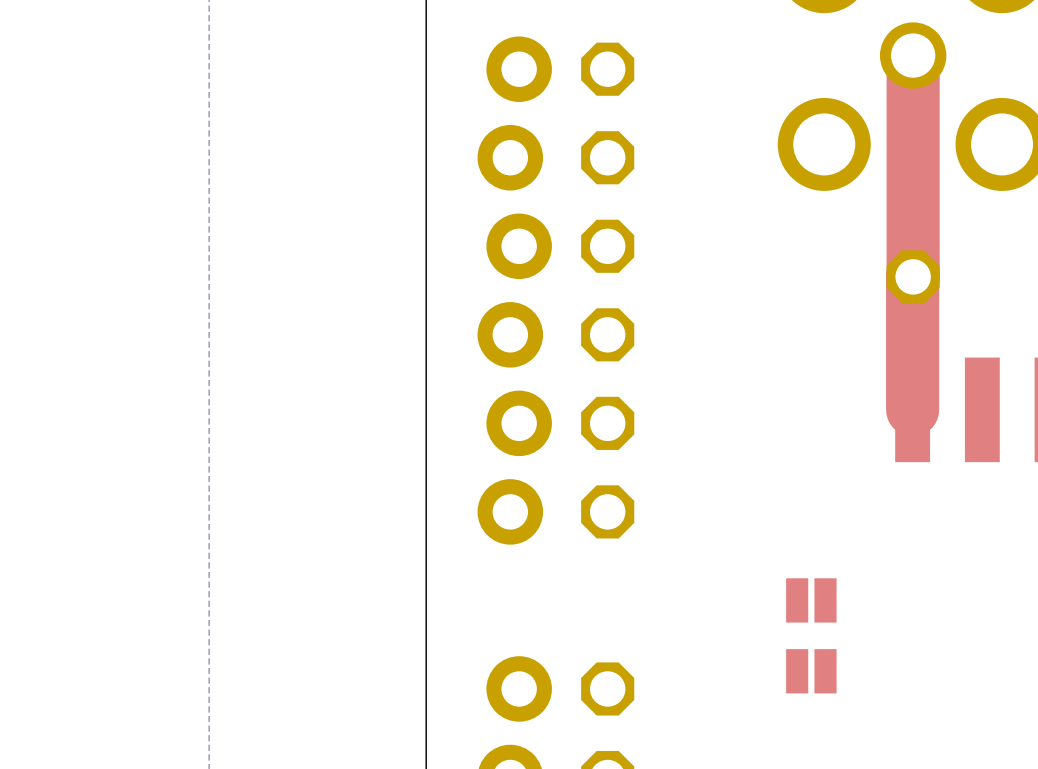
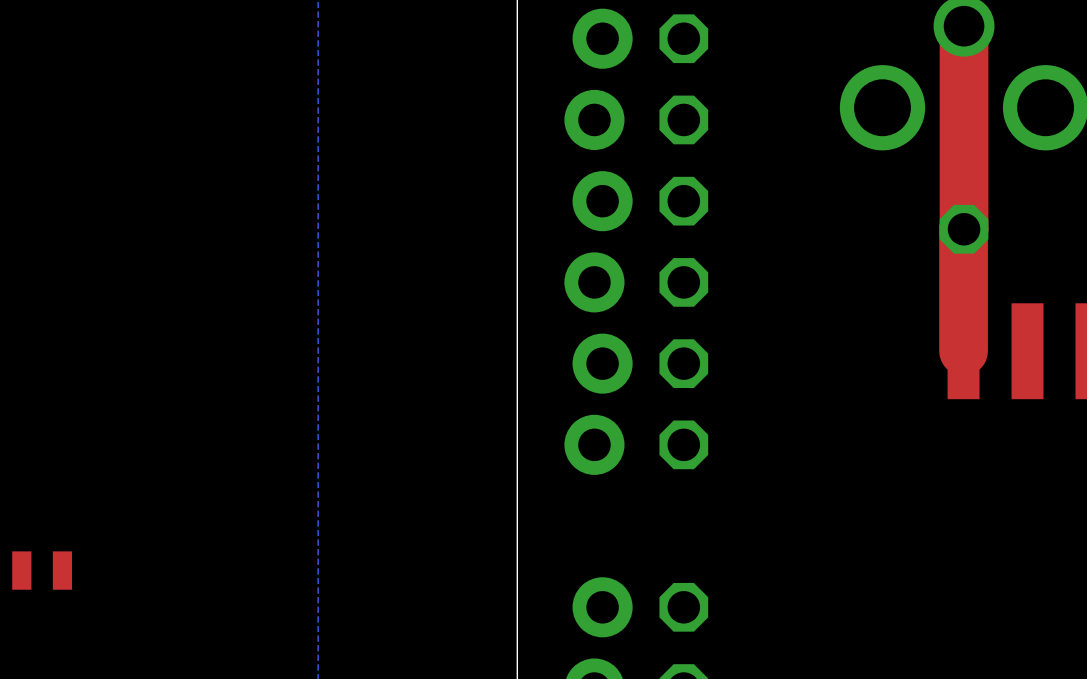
part: (811, 600) -> none
part: (811, 671) -> none

